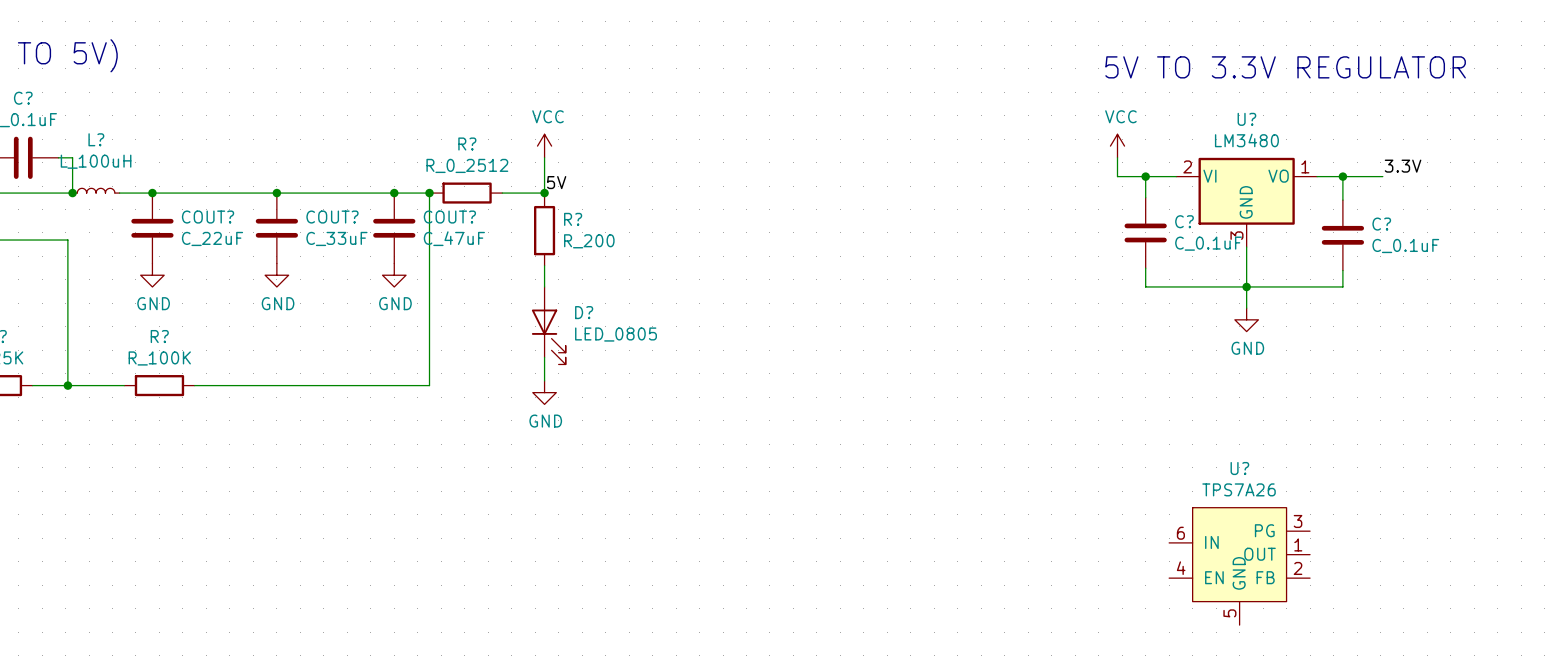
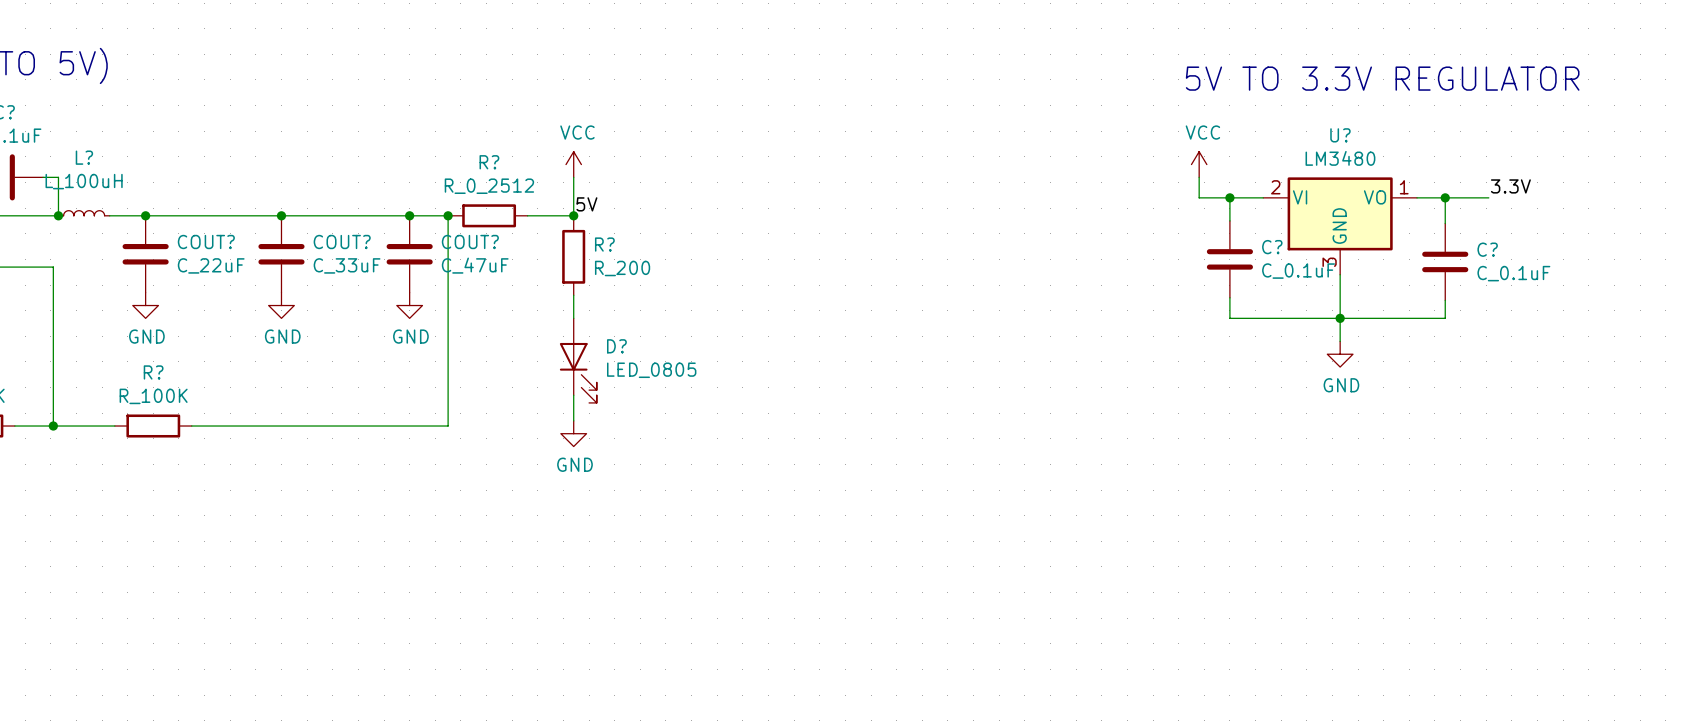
U?: TPS7A26 (1239, 566) -> none

